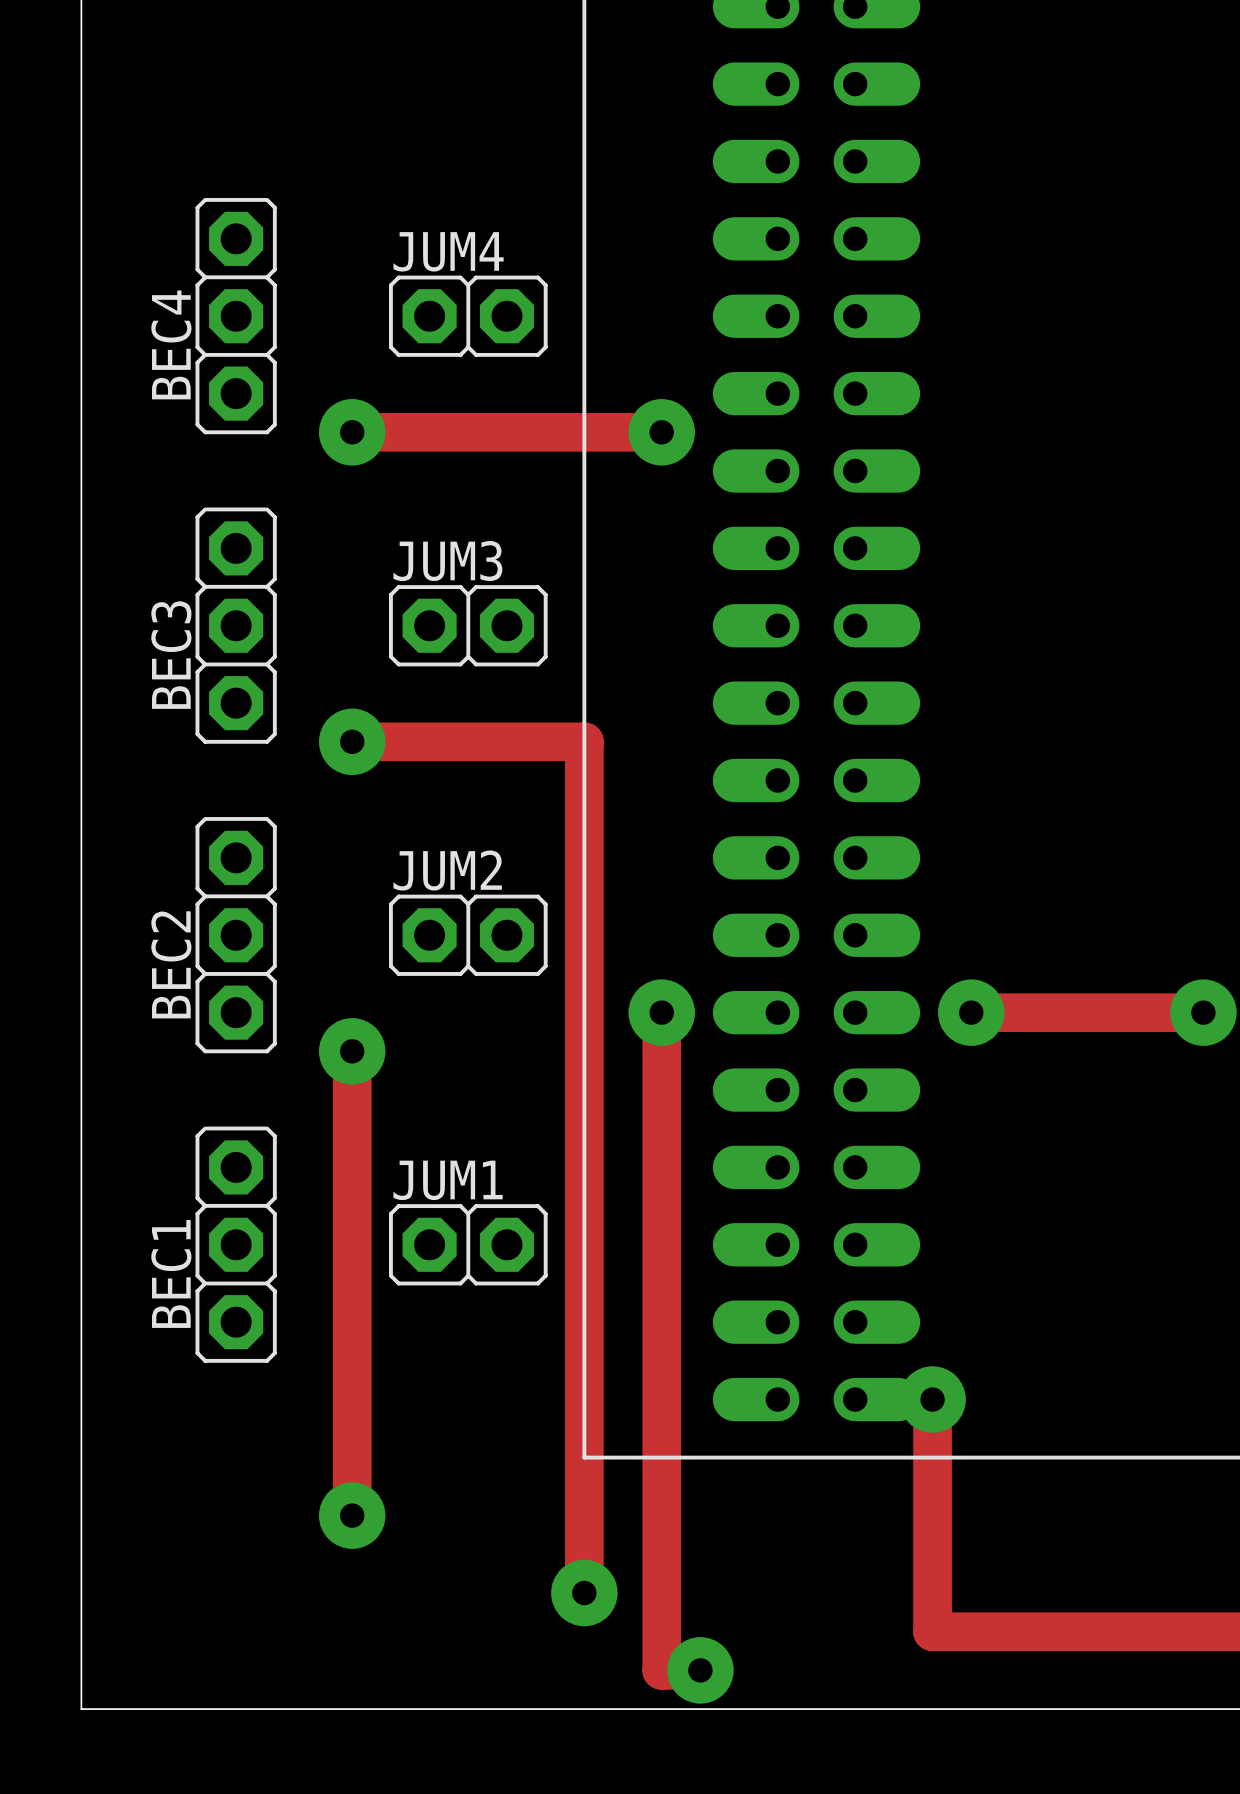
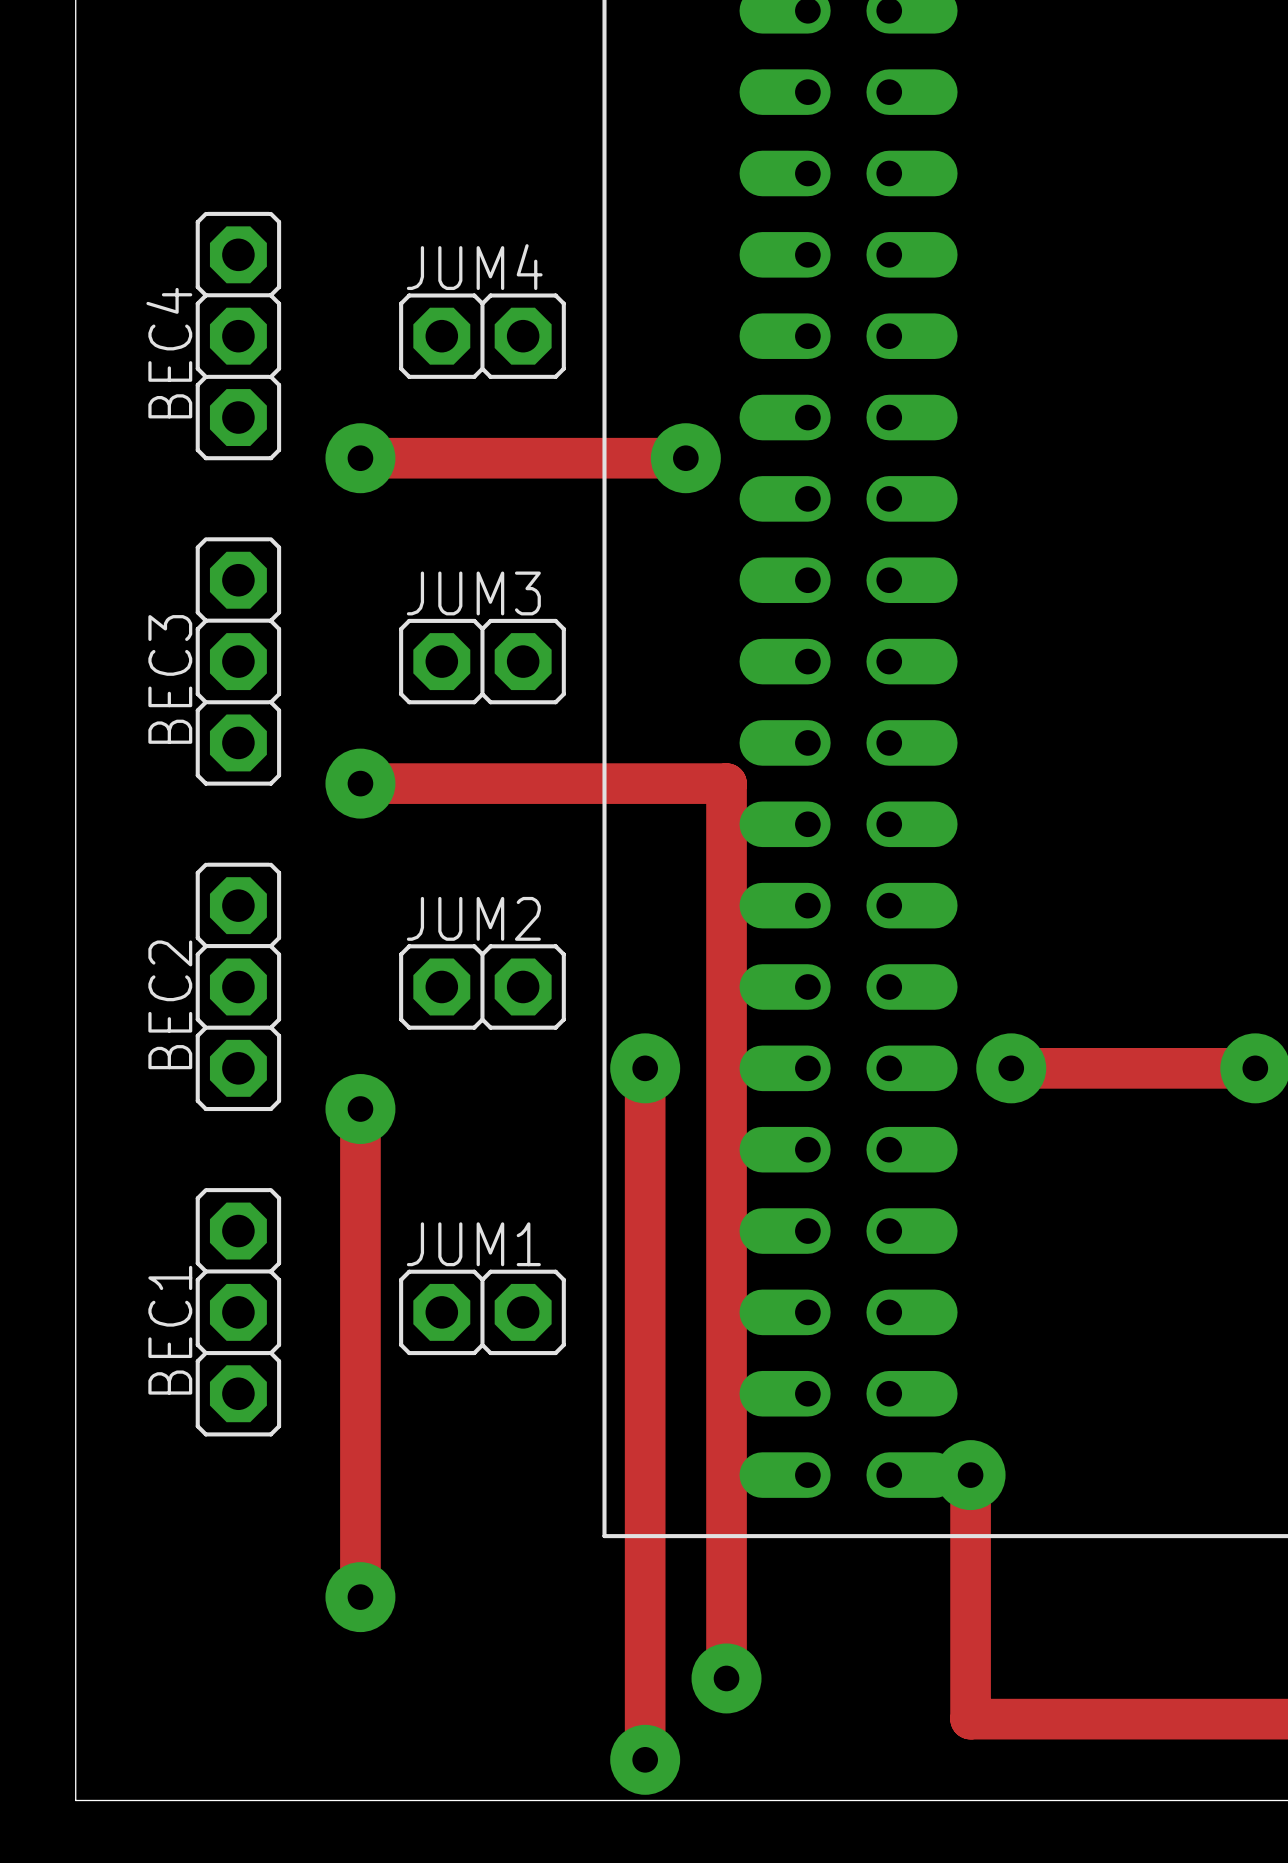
track: (584, 741) (584, 1593) -> (604, 783) (726, 783) (726, 1678)
track: none -> (645, 1068) (645, 1759)
track: (661, 1012) (661, 1670) (700, 1670) -> none
via position: (661, 1012) -> (645, 1068)
via: (584, 1593) -> none
via: none -> (726, 1678)
via: none -> (645, 1759)
via: (700, 1670) -> none

